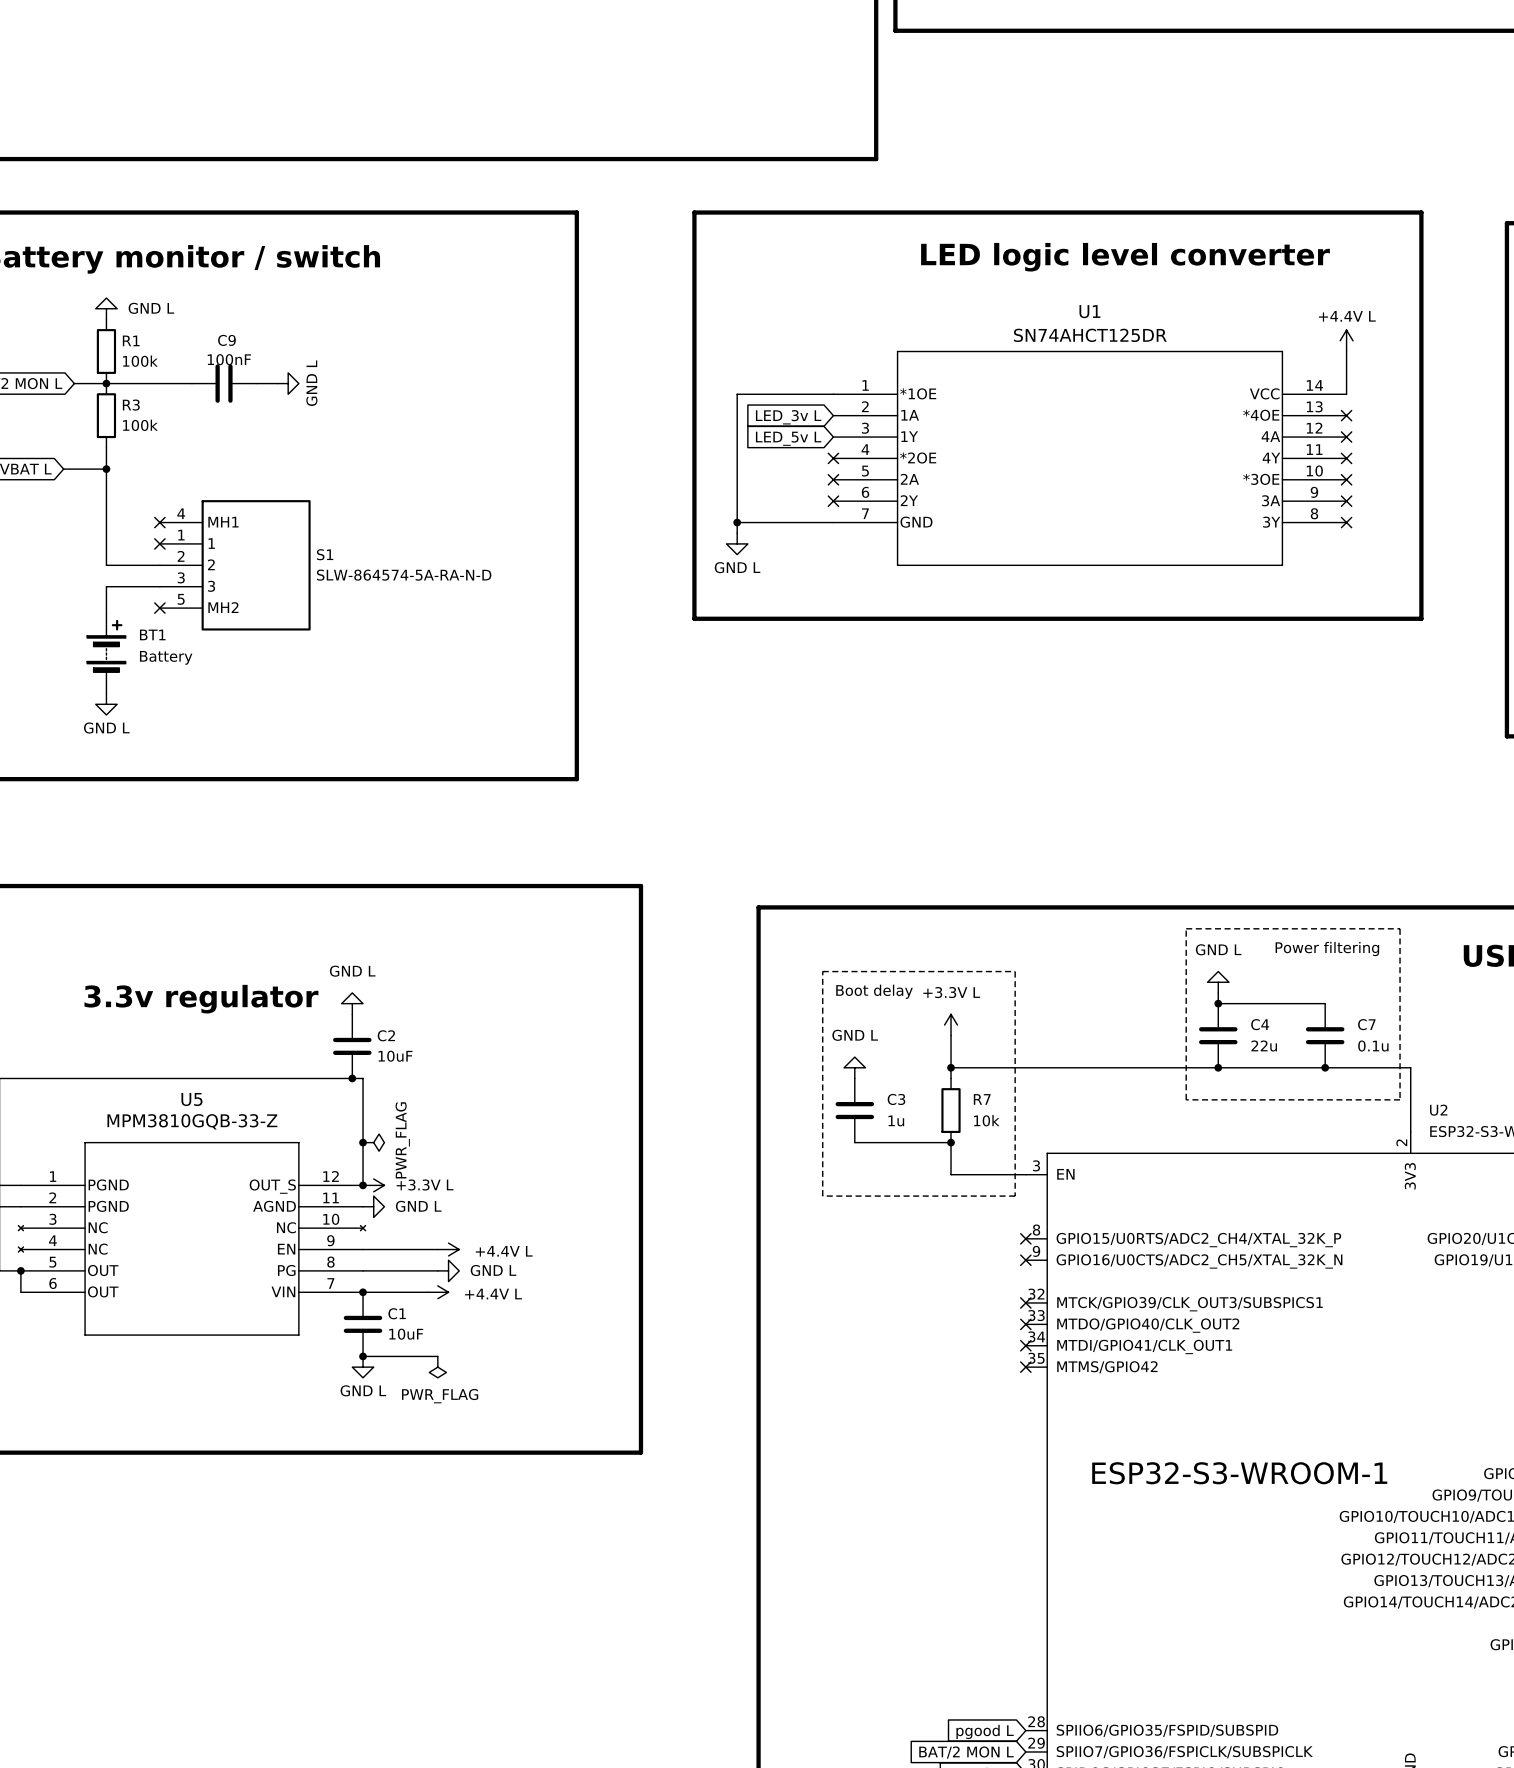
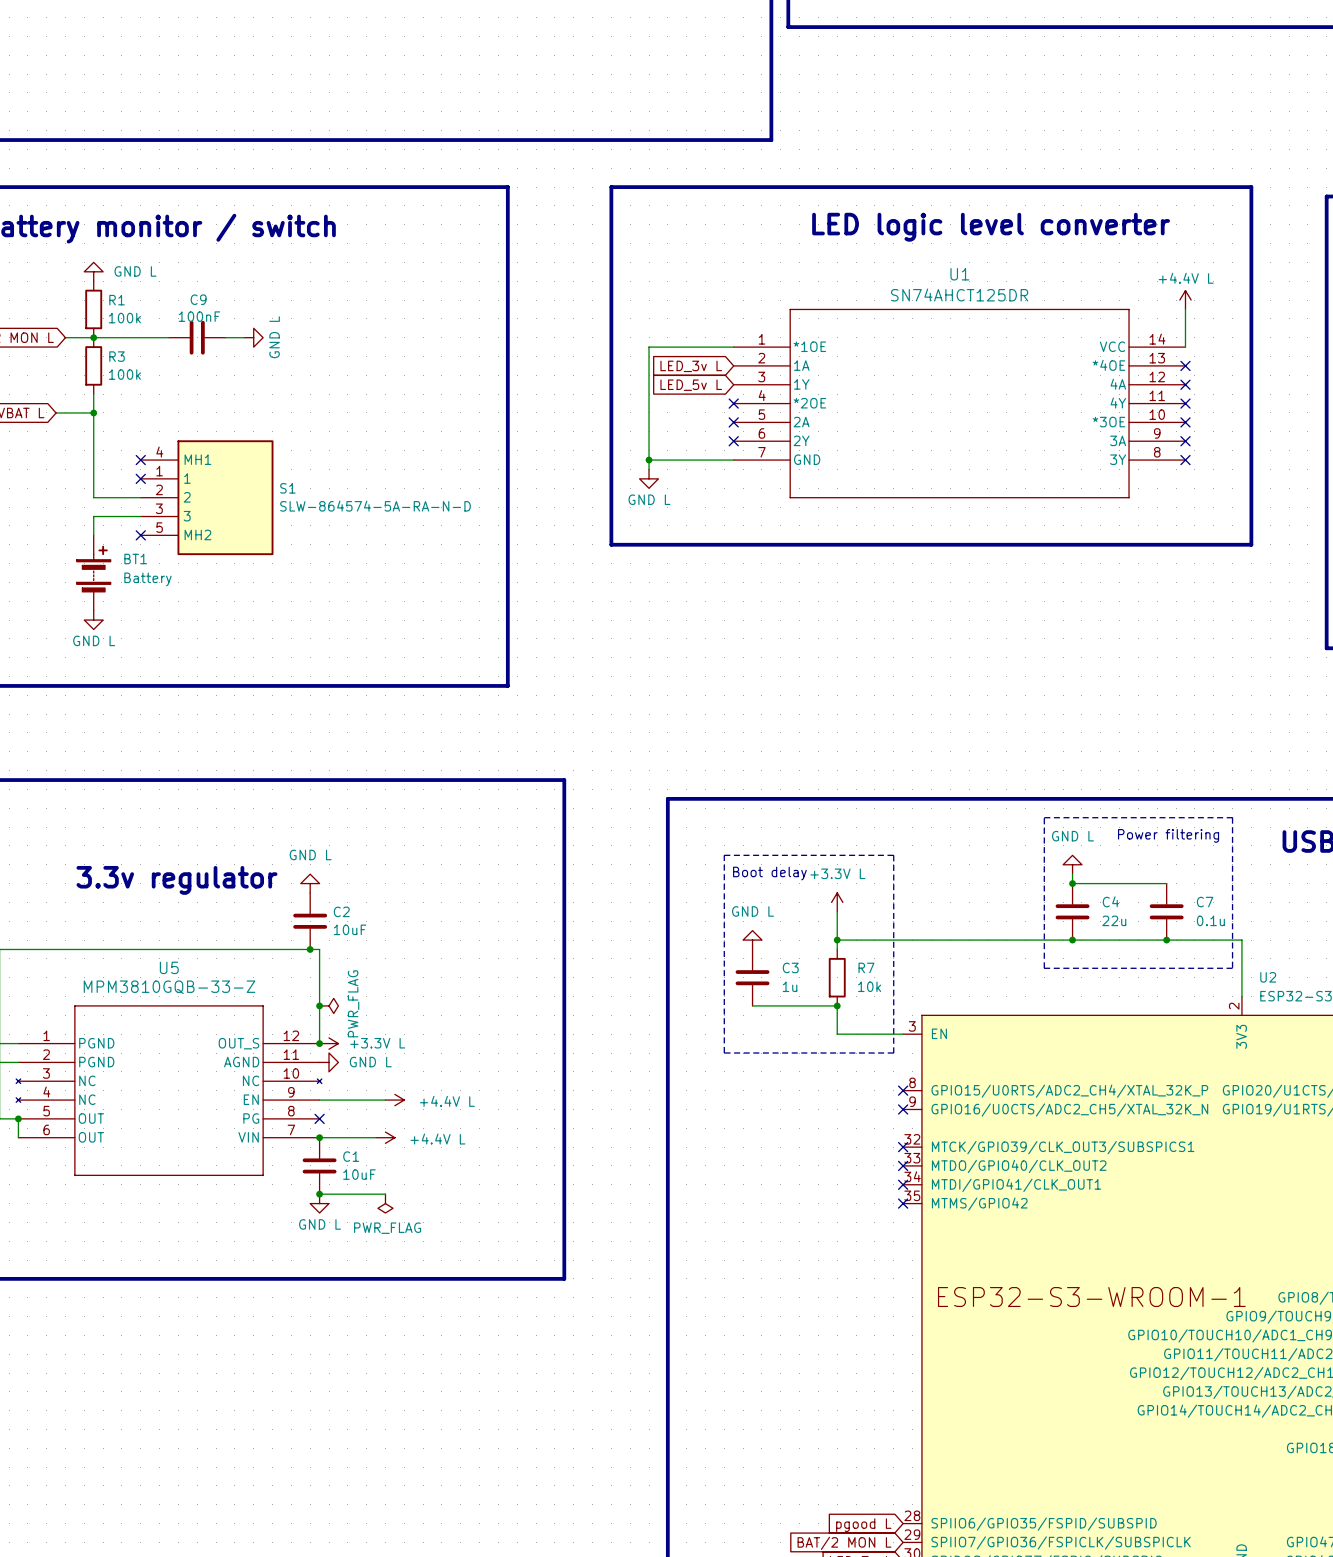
wire: (363, 1270) (437, 1270) -> none
no-connect mark: none -> (319, 1118)
power symbol: GND L (448, 1270) -> none

